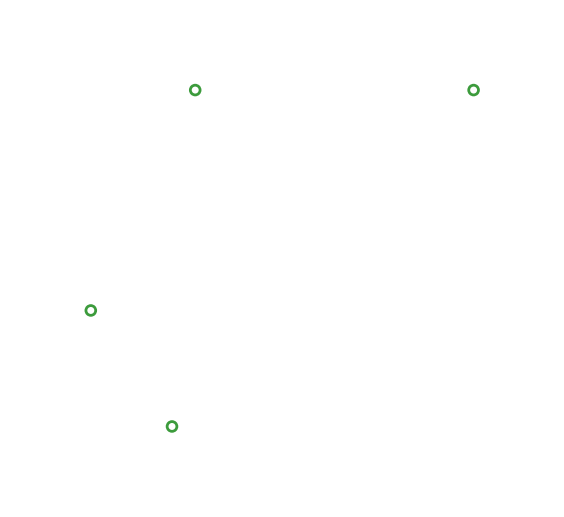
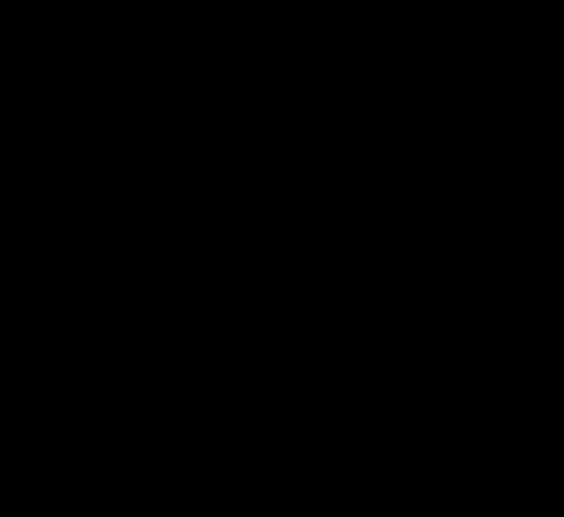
via: (195, 90) -> none
via: (473, 90) -> none
via: (90, 310) -> none
via: (172, 426) -> none

